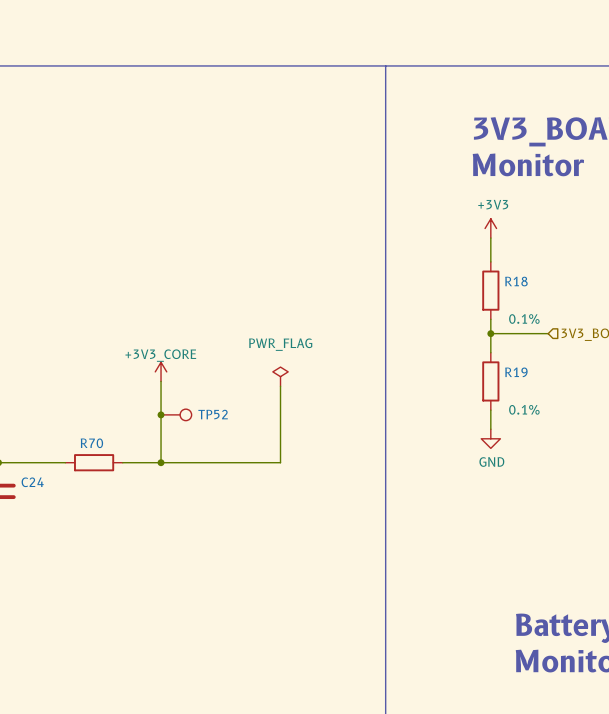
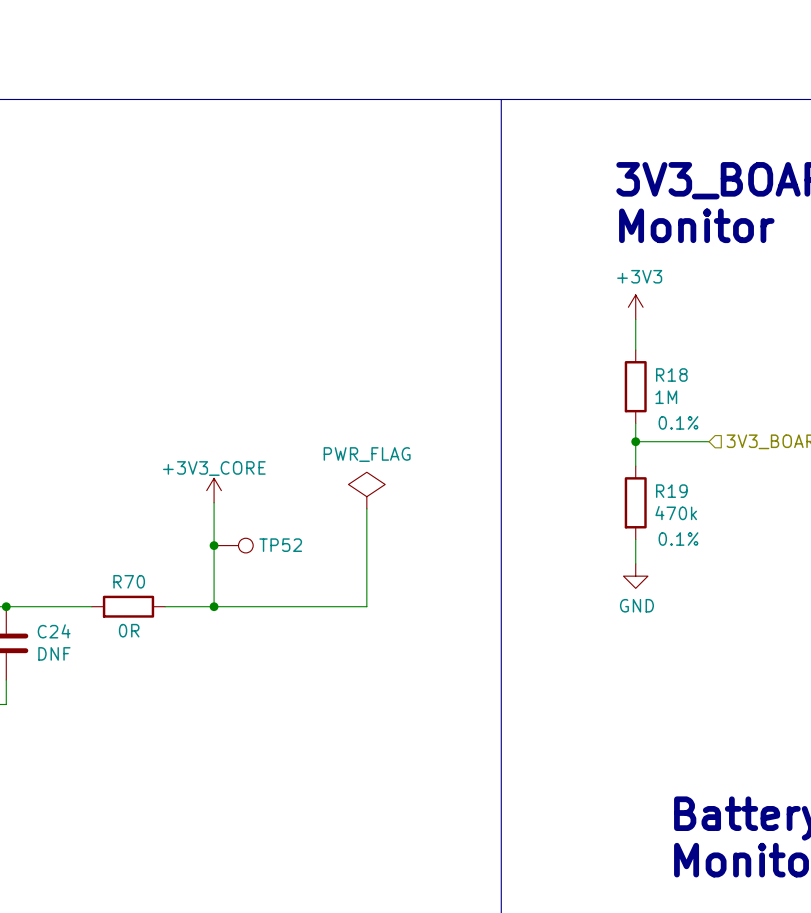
R18 value: none -> 1M (666, 397)
power symbol shape: [272, 367, 289, 387] -> [348, 472, 386, 509]
R19 value: none -> 470k (676, 513)
R70 value: none -> 0R (129, 630)
C24 value: none -> DNF (54, 653)

